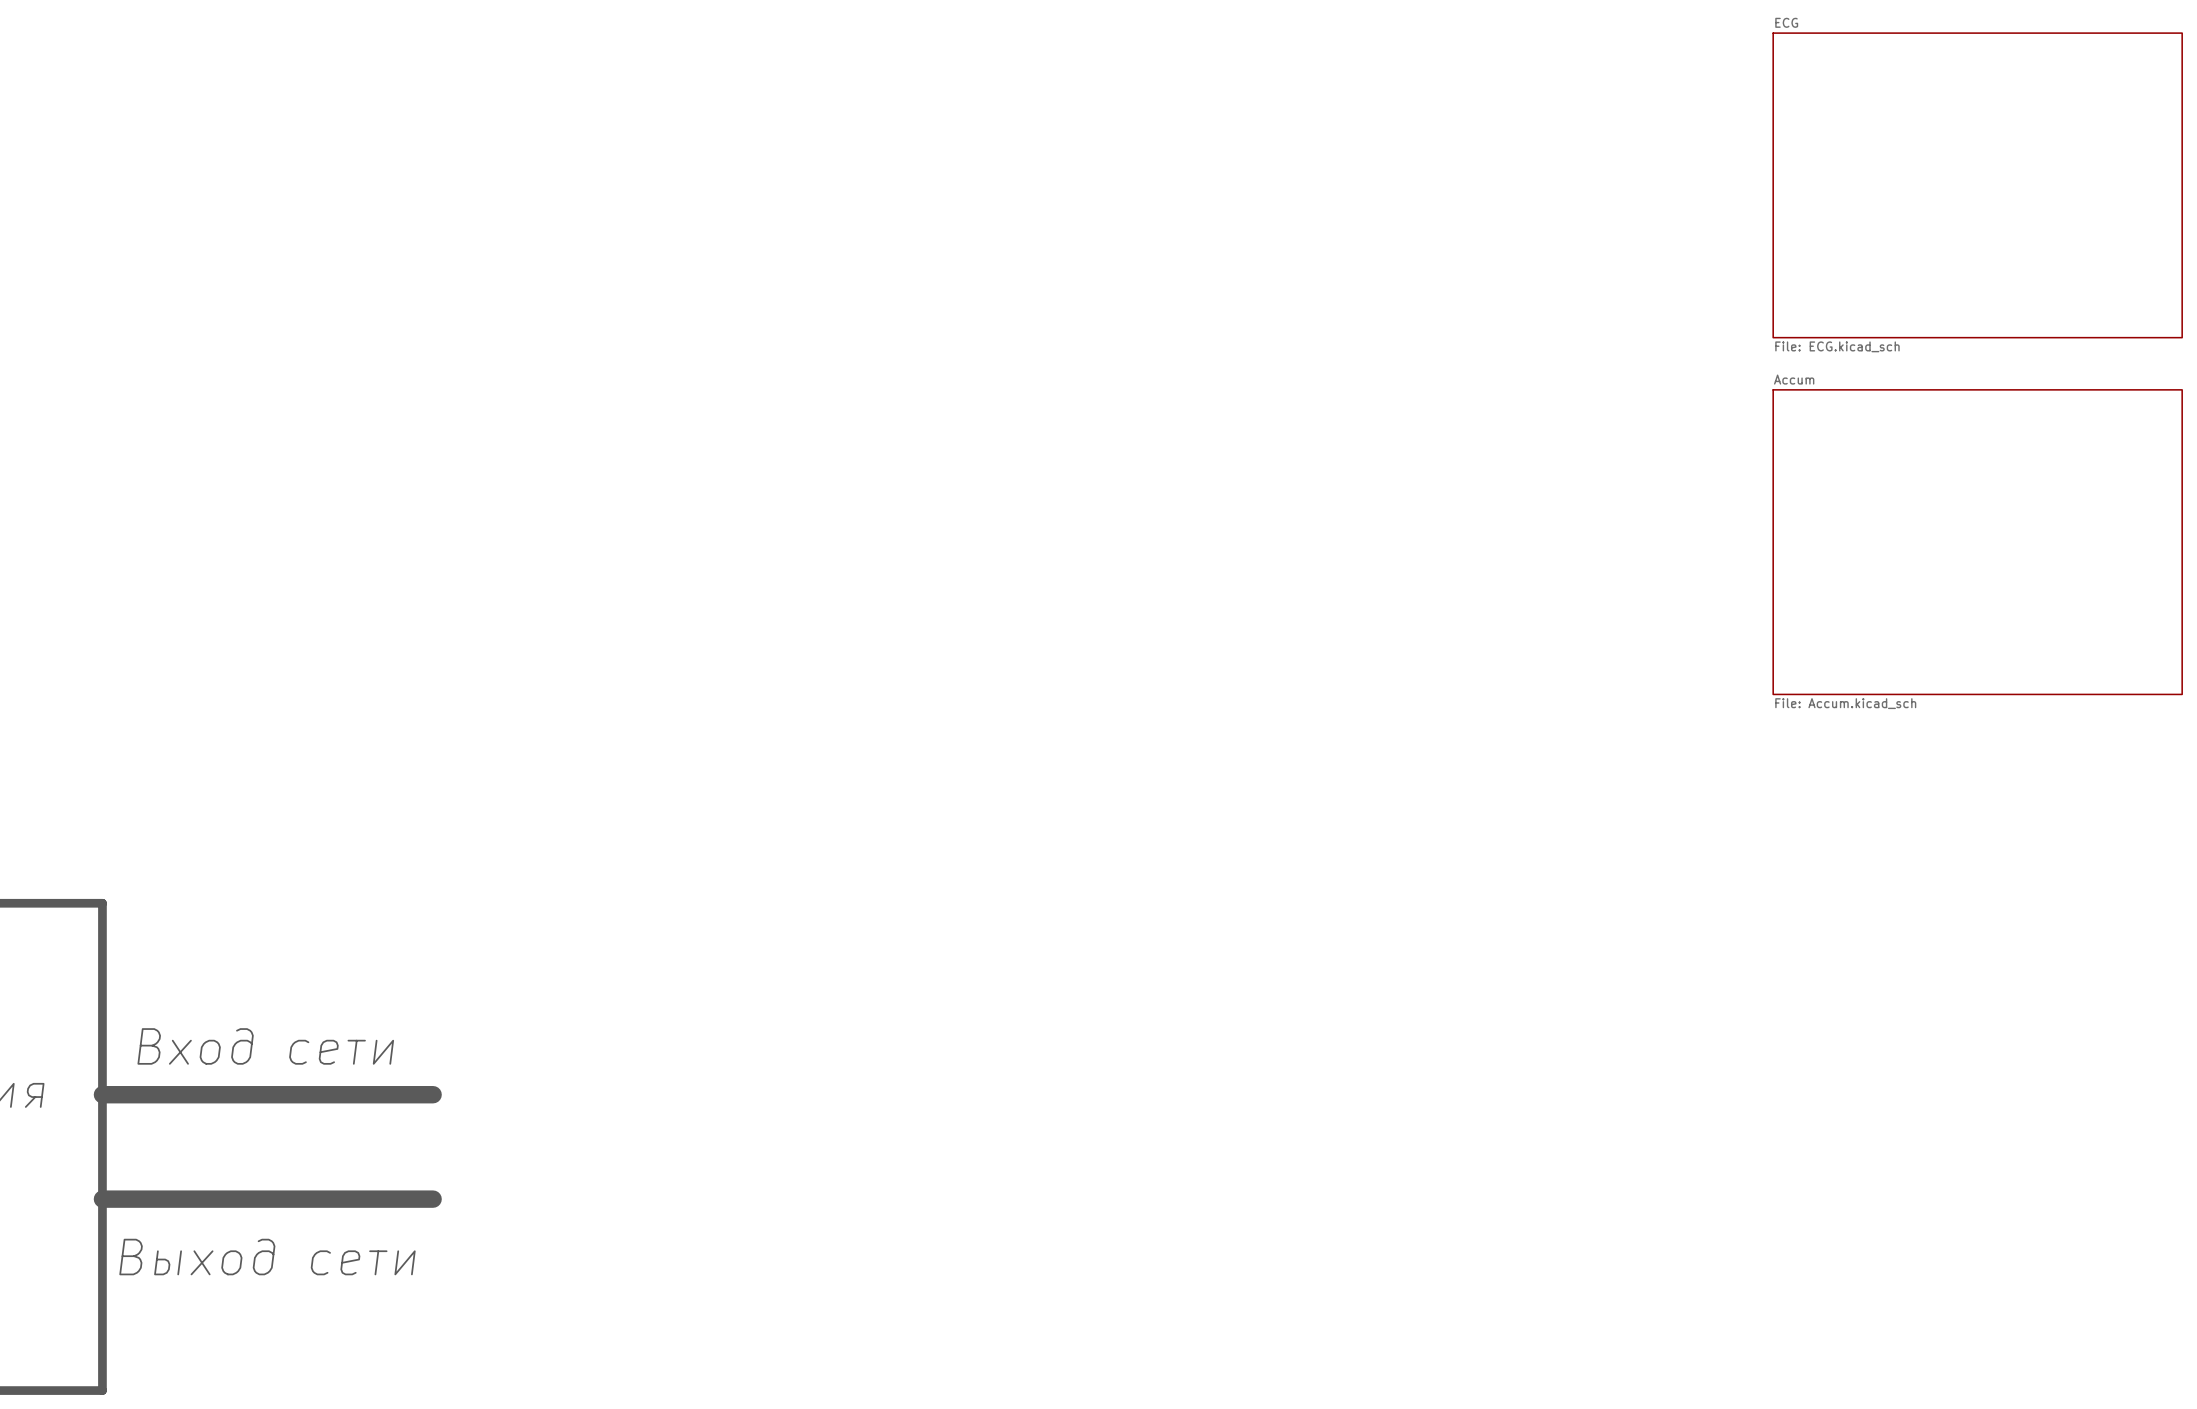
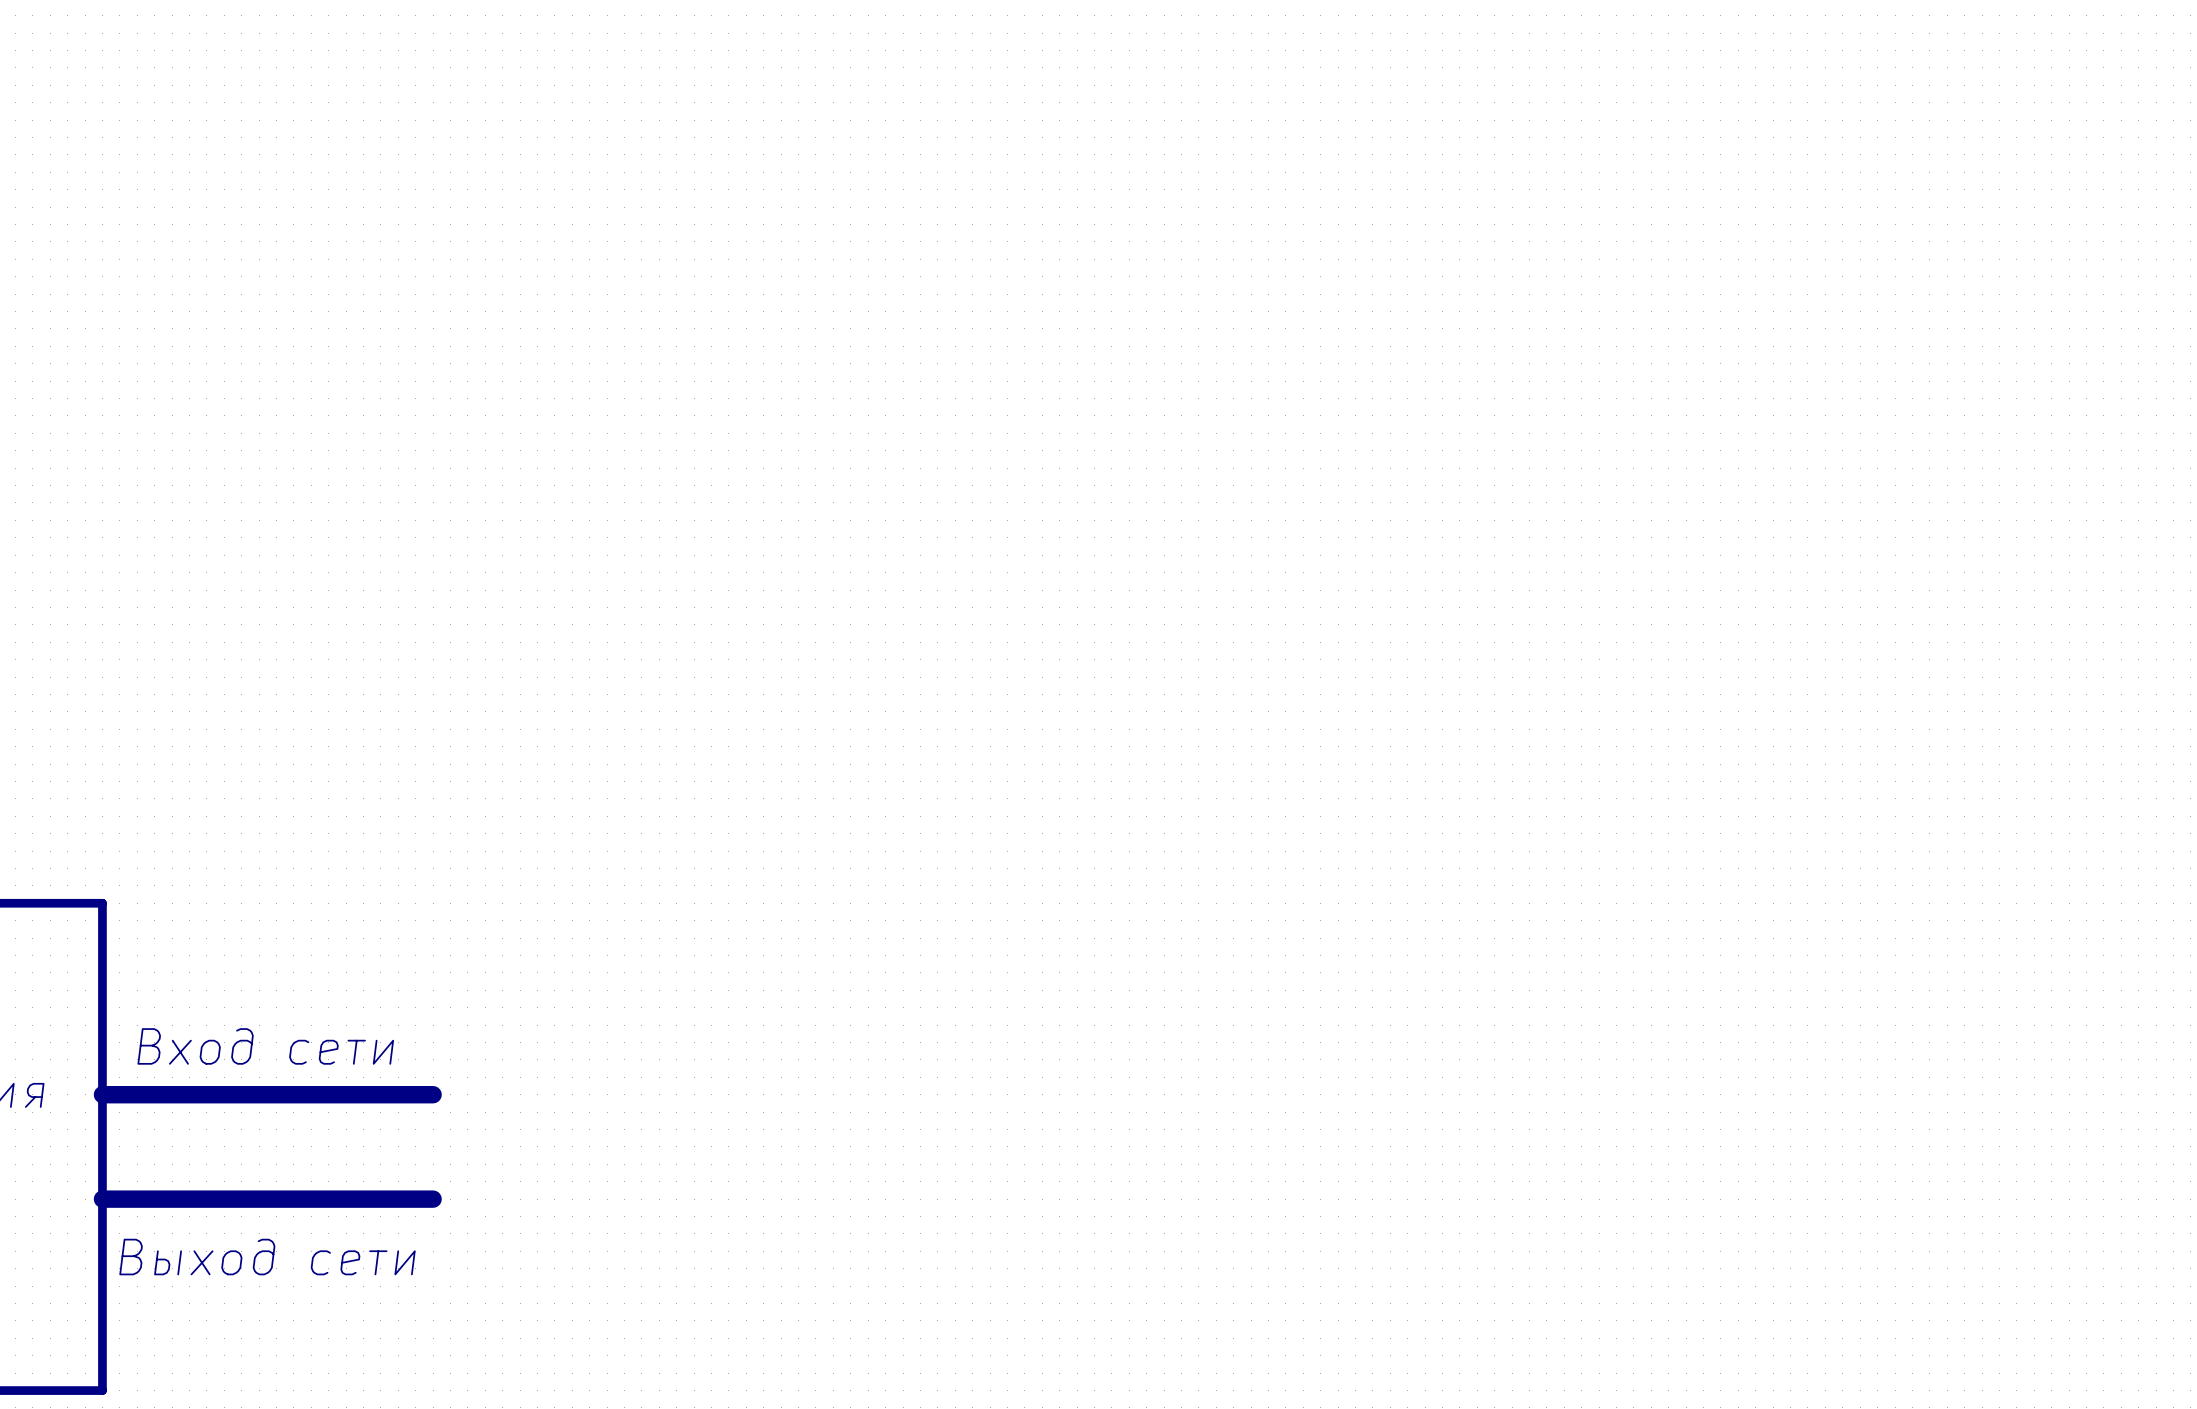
sheet ECG: File: ECG.kicad_sch (1977, 185) -> none
sheet Accum: File: Accum.kicad_sch (1977, 542) -> none

